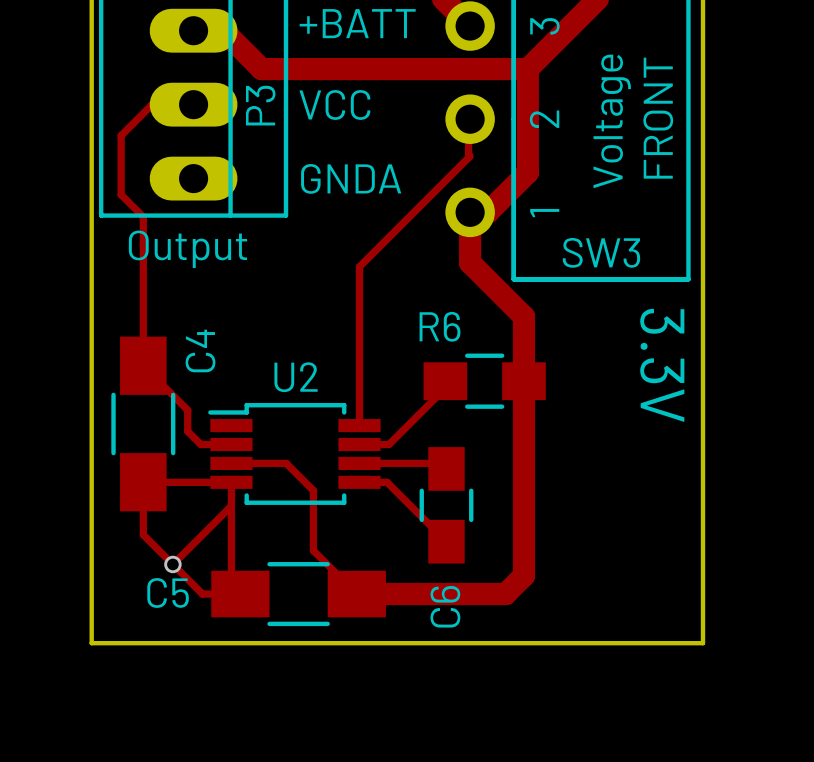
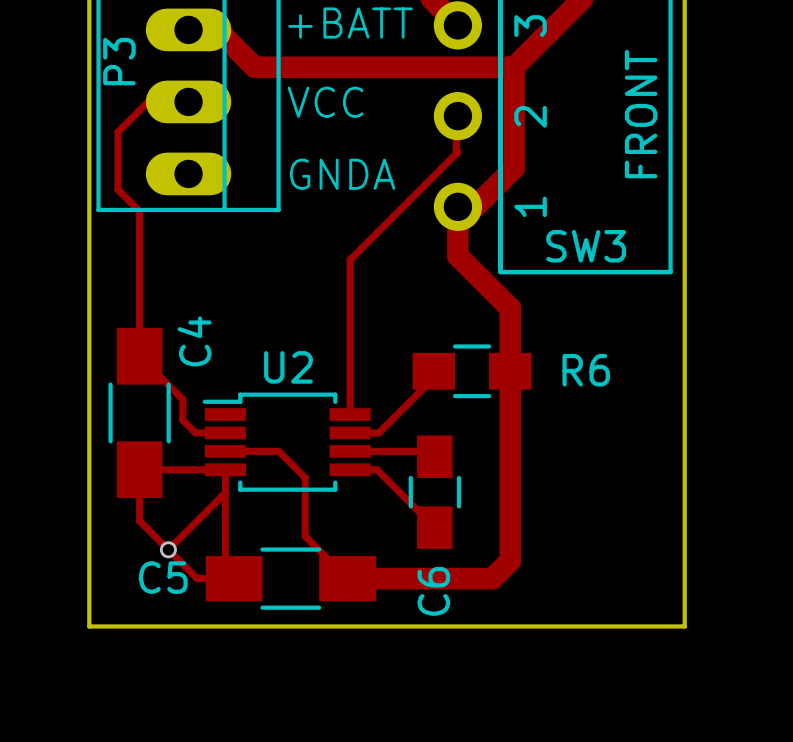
P3 name position: P3 (260, 105) -> P3 (119, 61)
SW3 value: Voltage (612, 121) -> none
P3 value: Output (188, 249) -> none
R6 name position: R6 (440, 326) -> R6 (586, 370)
text: 3.3V (662, 365) -> none

